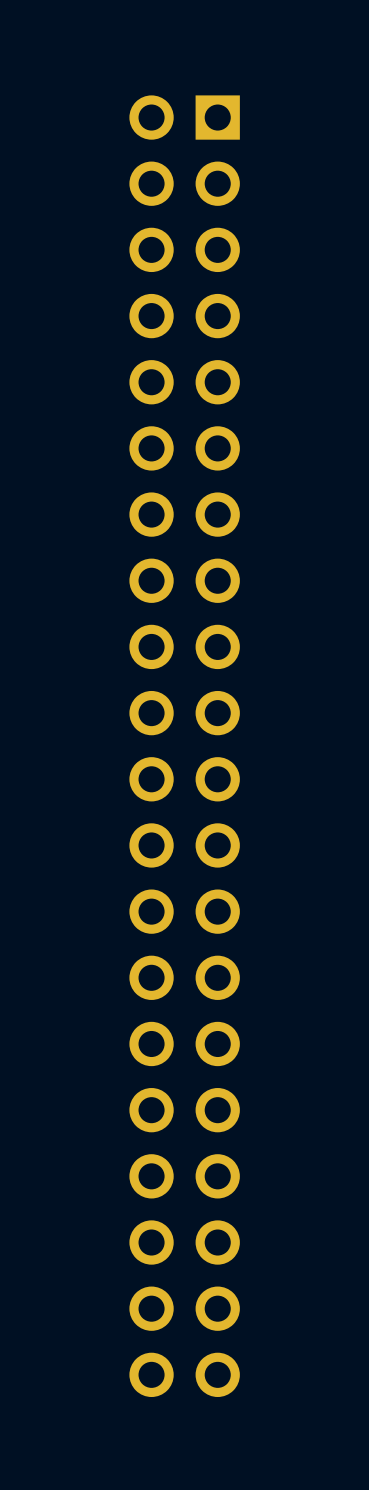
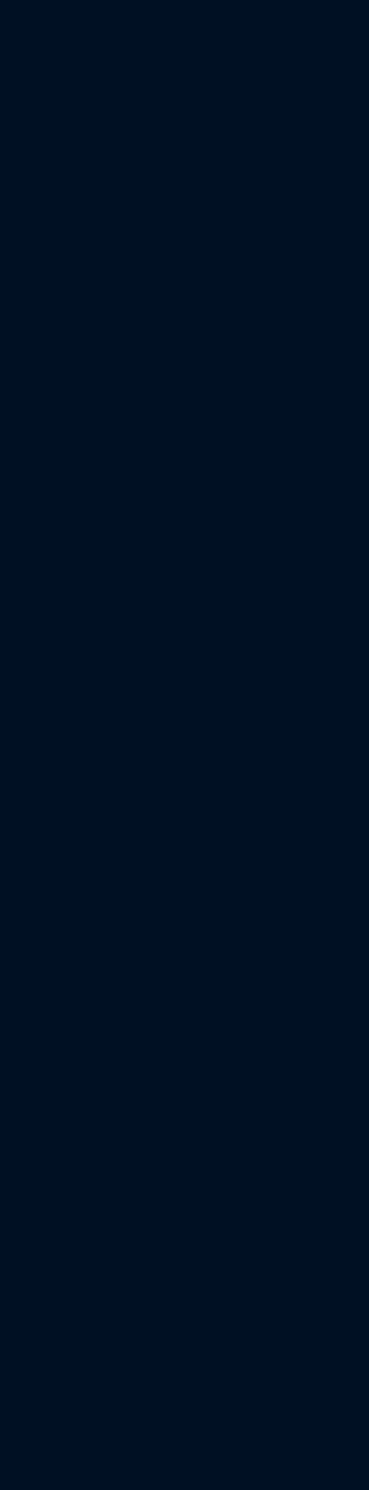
part: (184, 746) -> none

